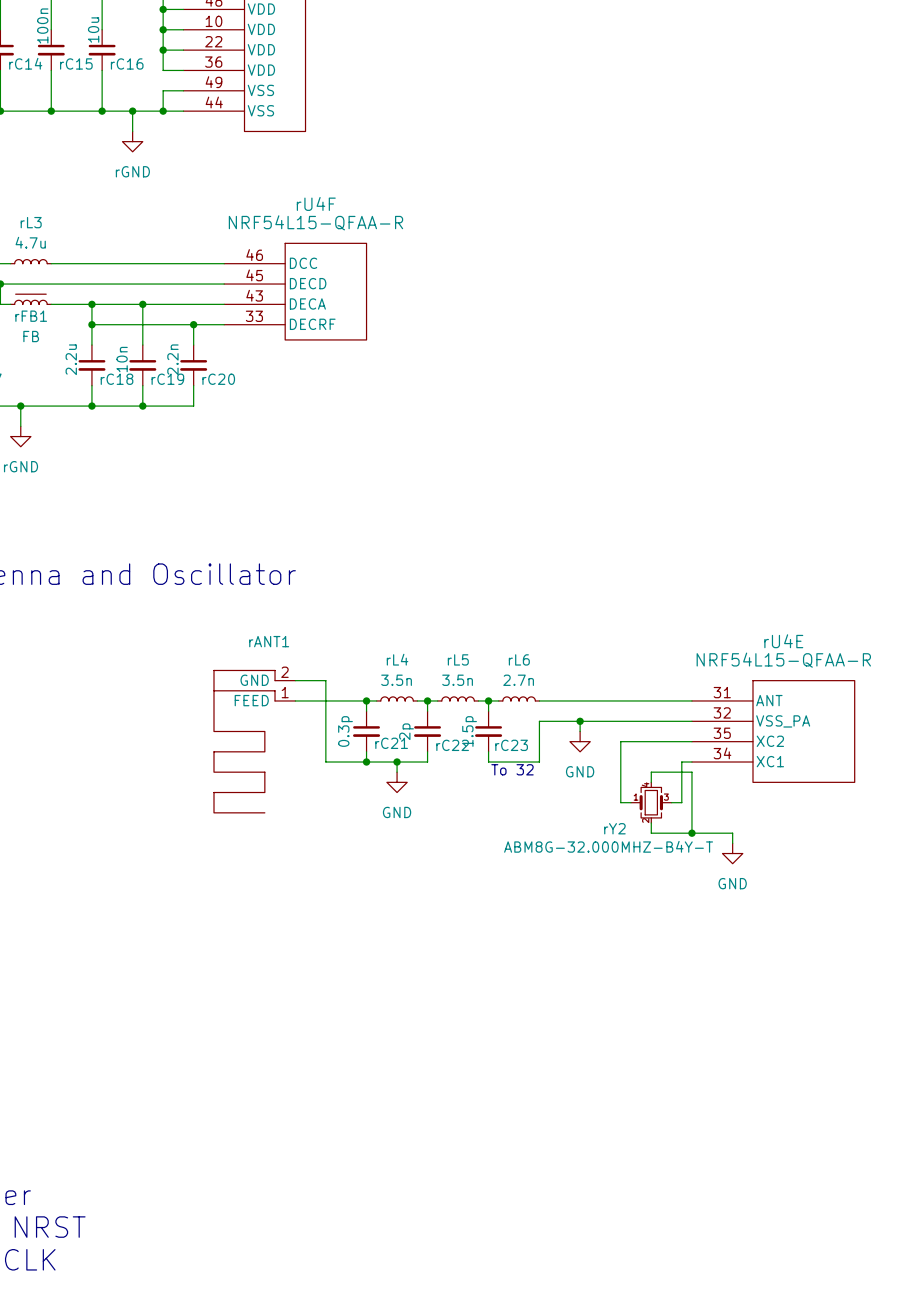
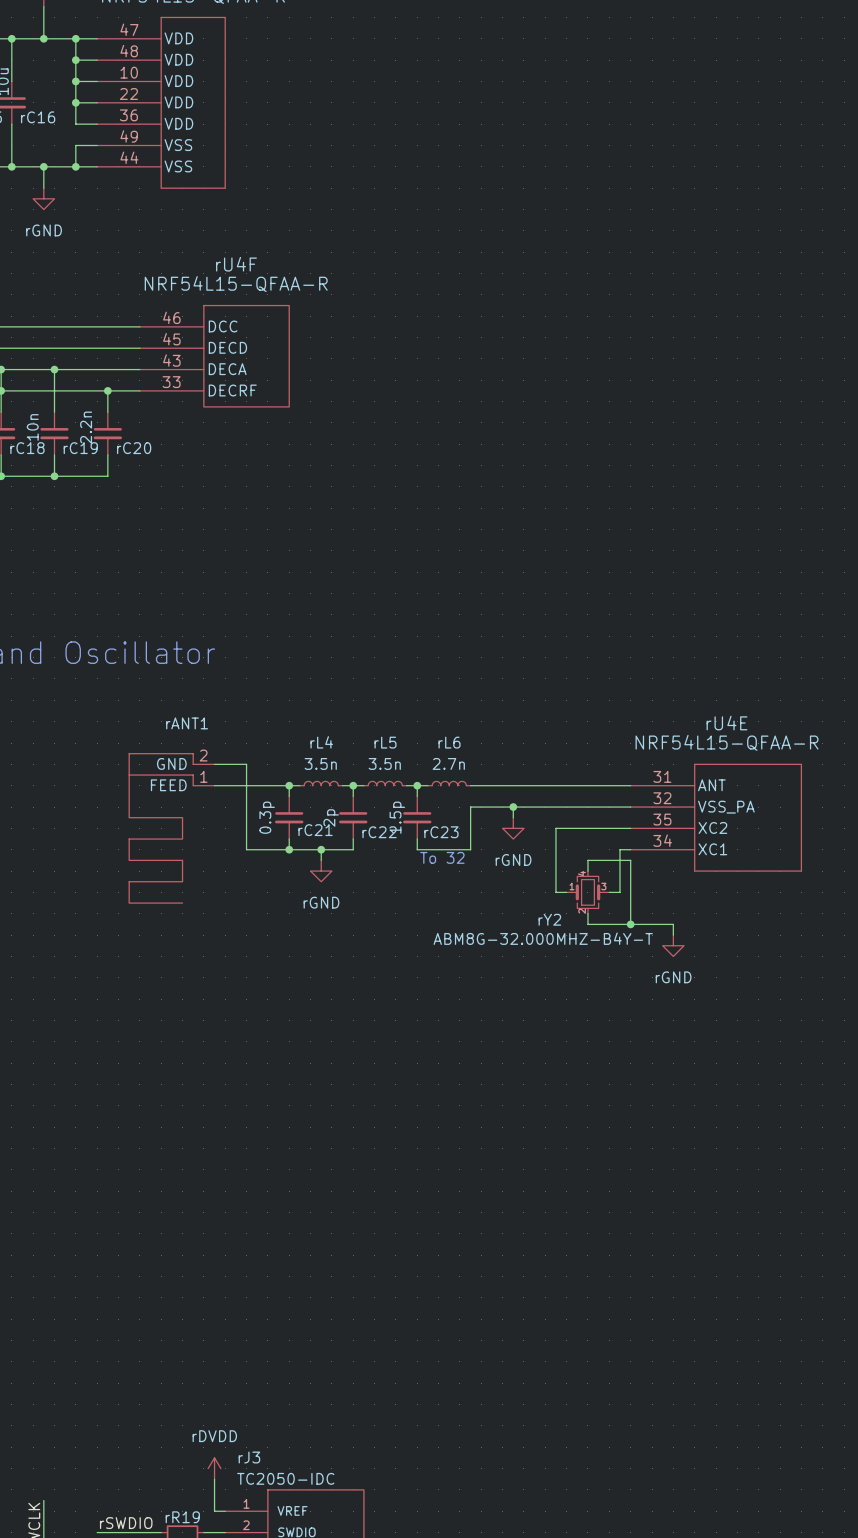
power symbol: GND (580, 741) -> rGND (513, 828)
power symbol: GND (397, 782) -> rGND (321, 871)
power symbol: GND (732, 853) -> rGND (673, 945)

